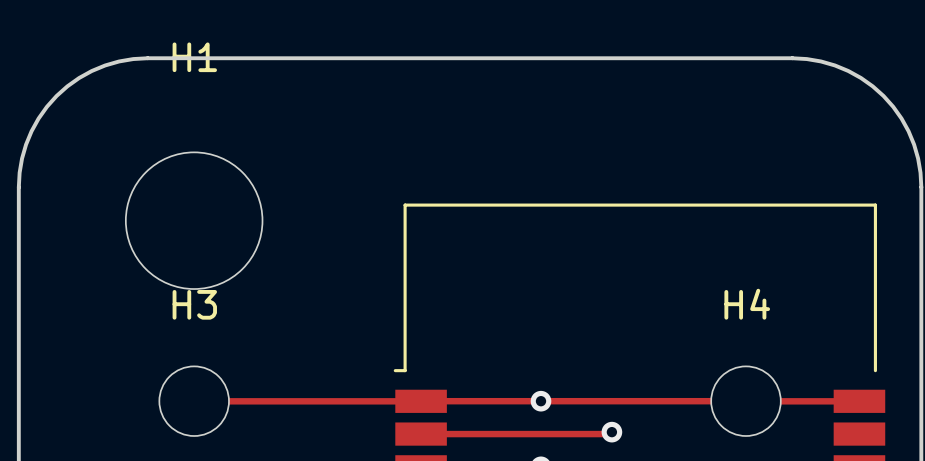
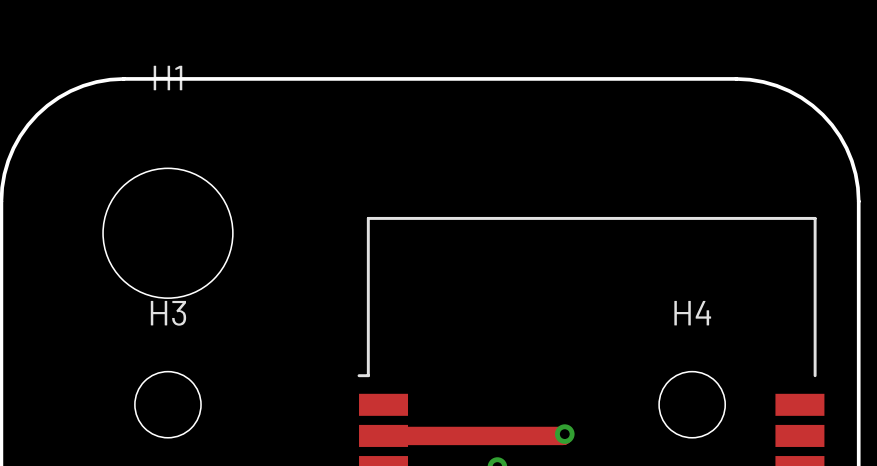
track: (194, 401) (859, 401) -> none
via: (540, 401) -> none
track width: thin (611, 432) (609, 434) (421, 434) -> thick (564, 434) (562, 435) (383, 435)

